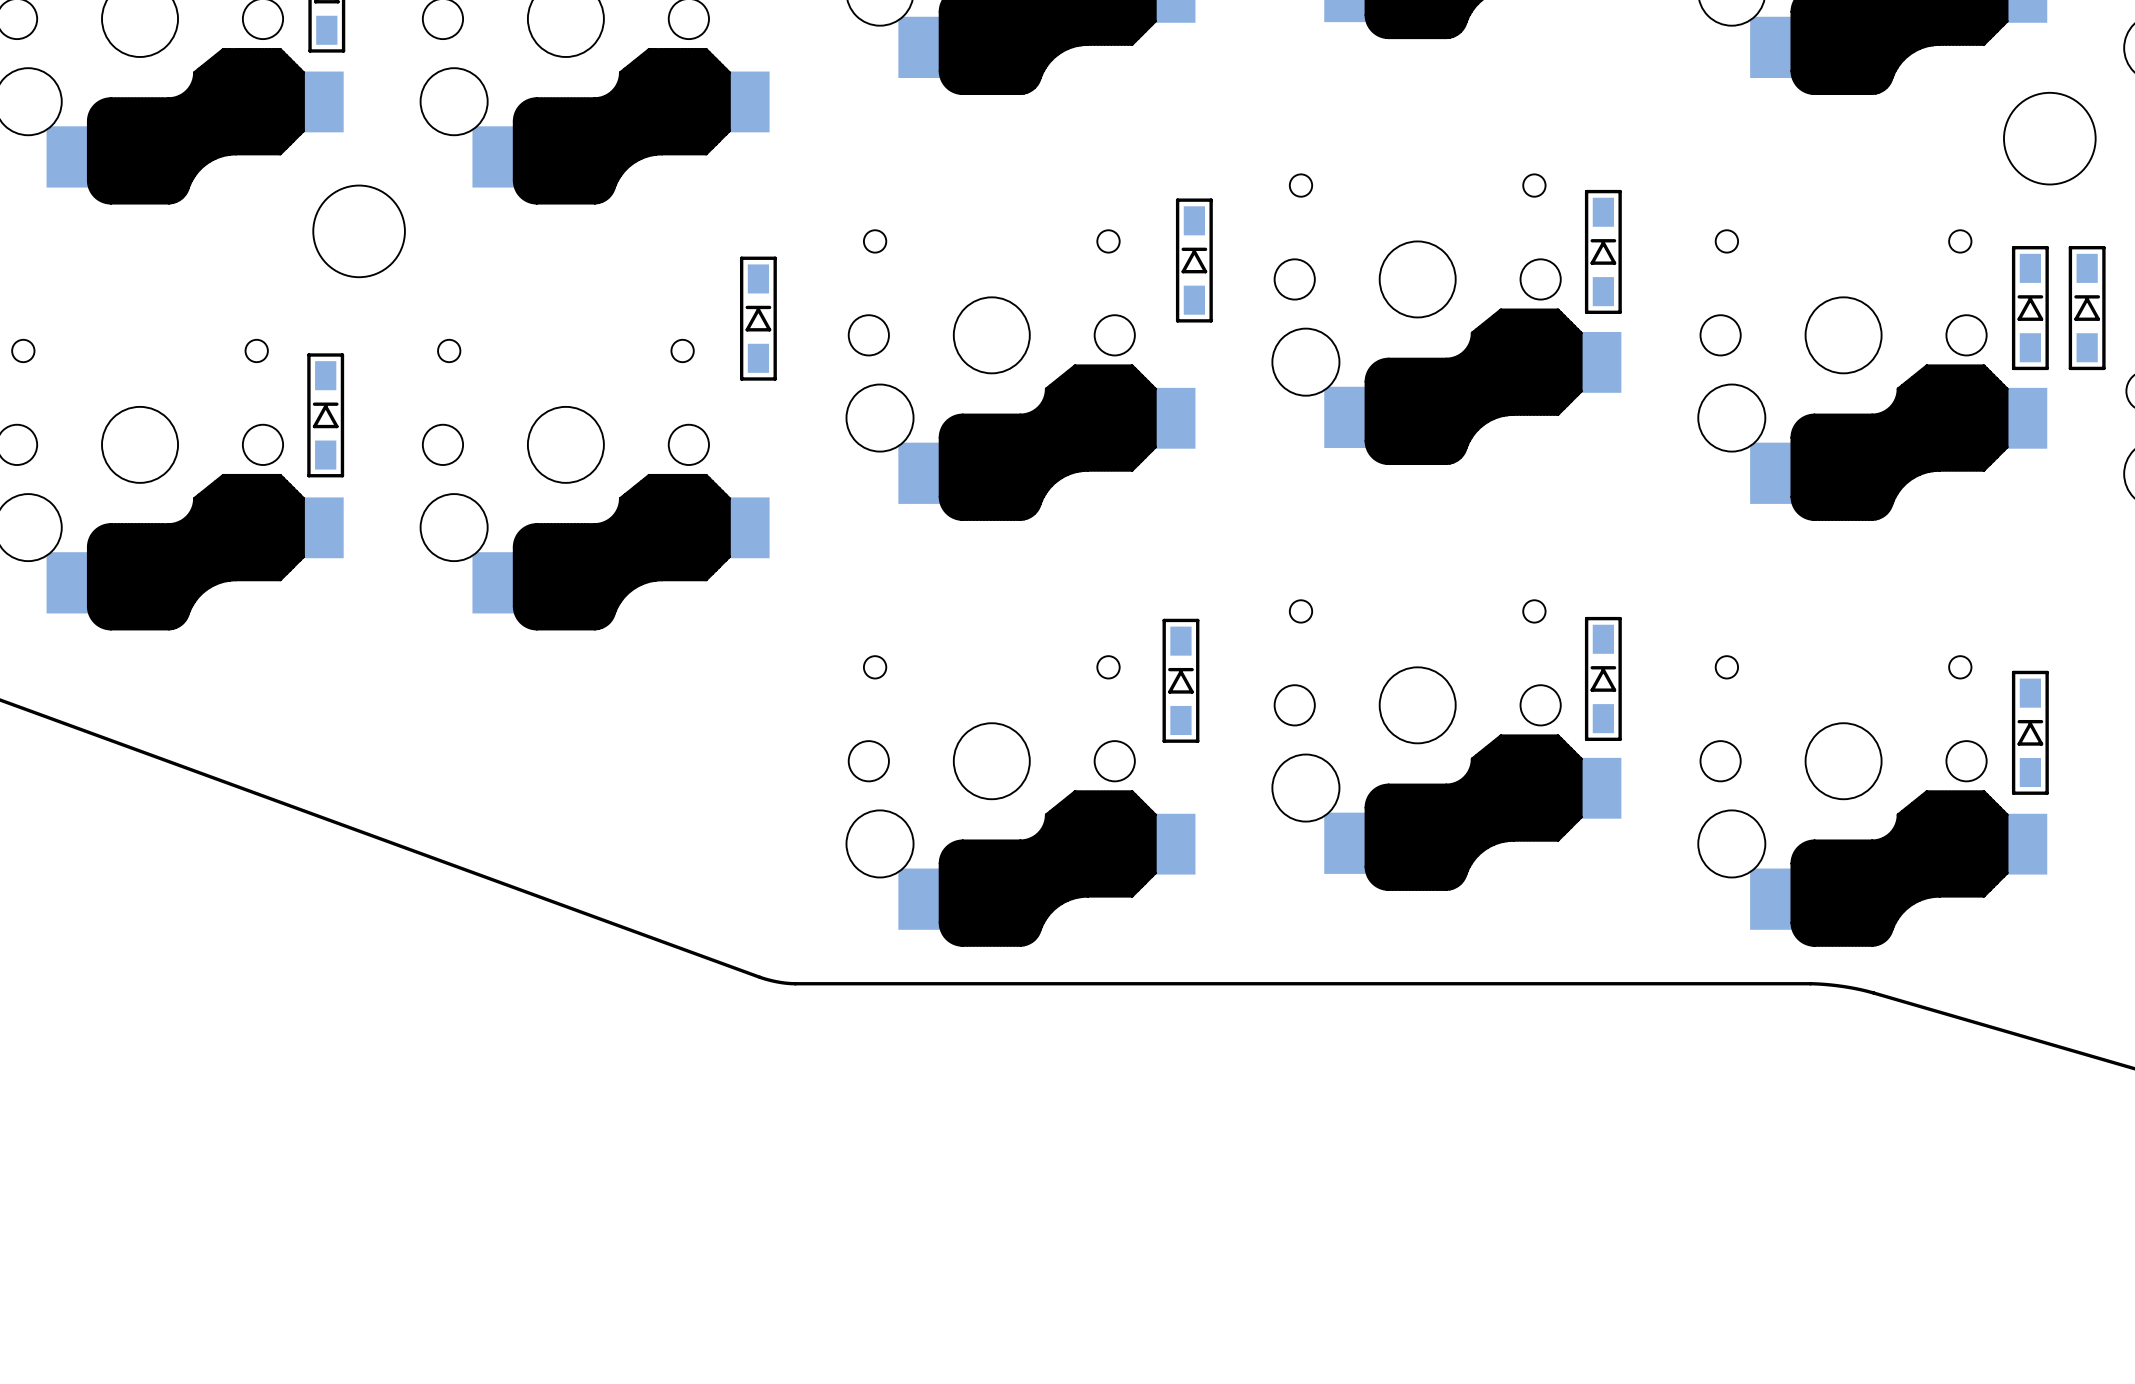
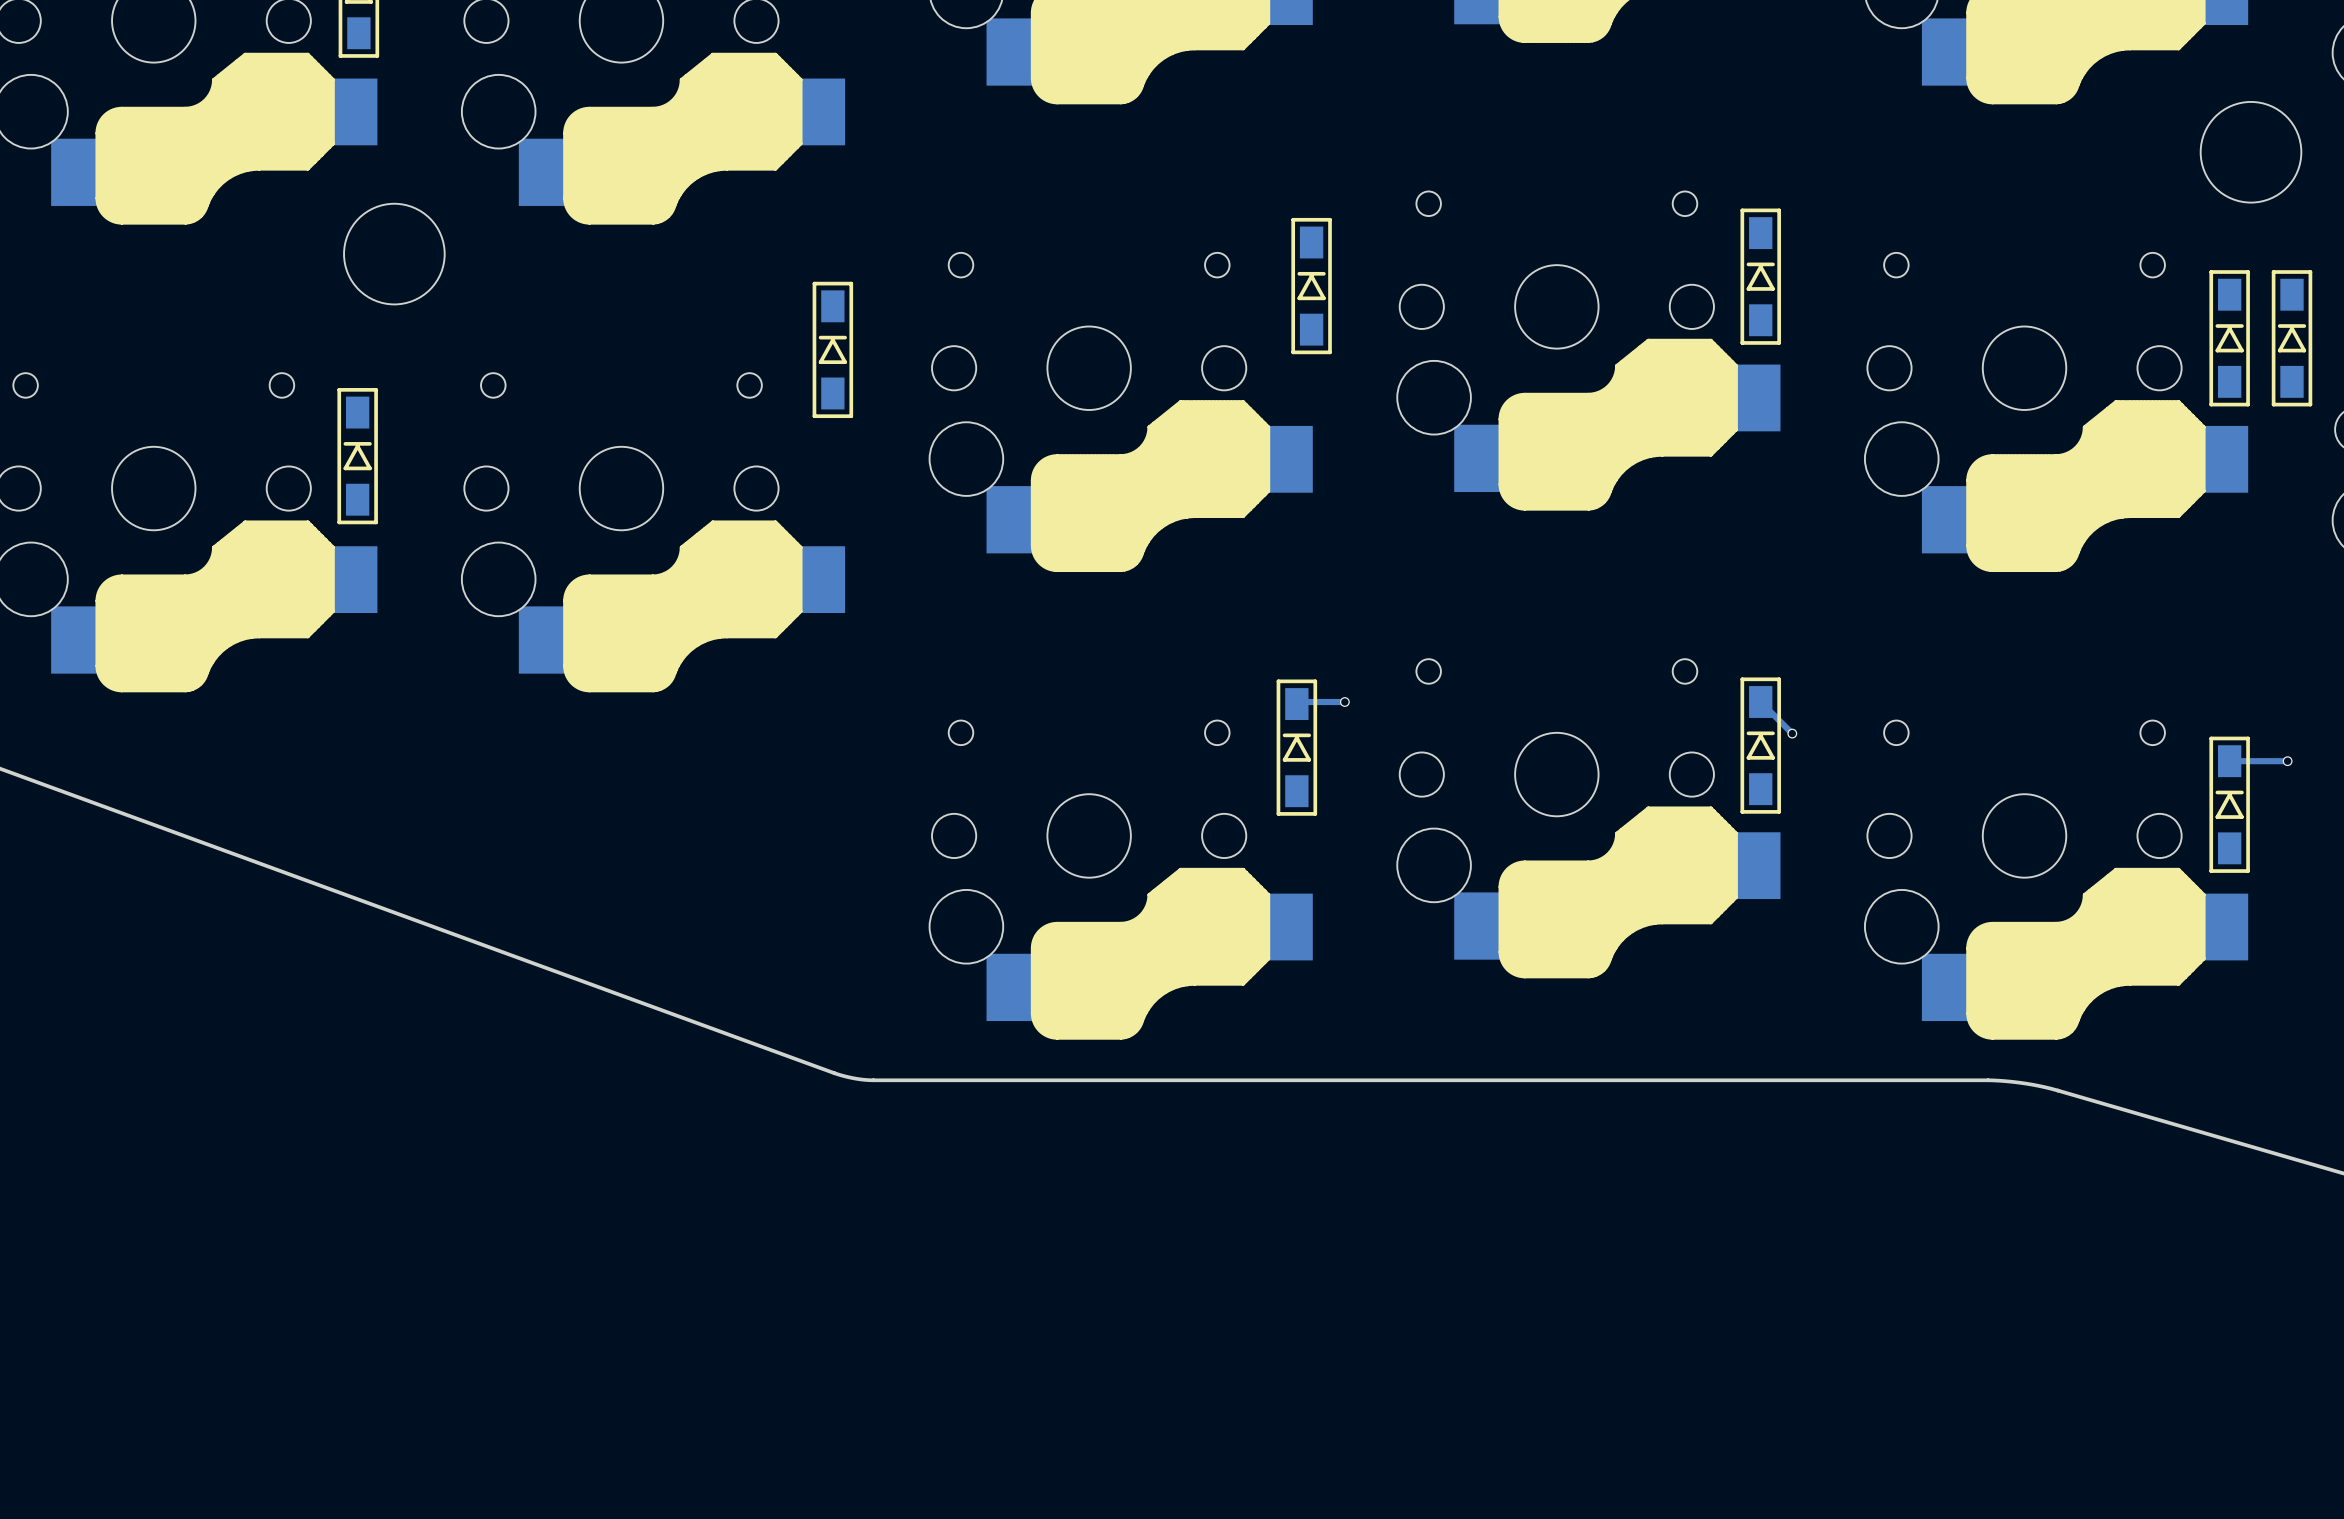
track: none -> (1344, 702) (1298, 702) (1296, 704)
via: none -> (1344, 702)
track: none -> (1760, 702) (1792, 733)
via: none -> (1792, 733)
track: none -> (2287, 761) (2229, 761)
via: none -> (2287, 761)

